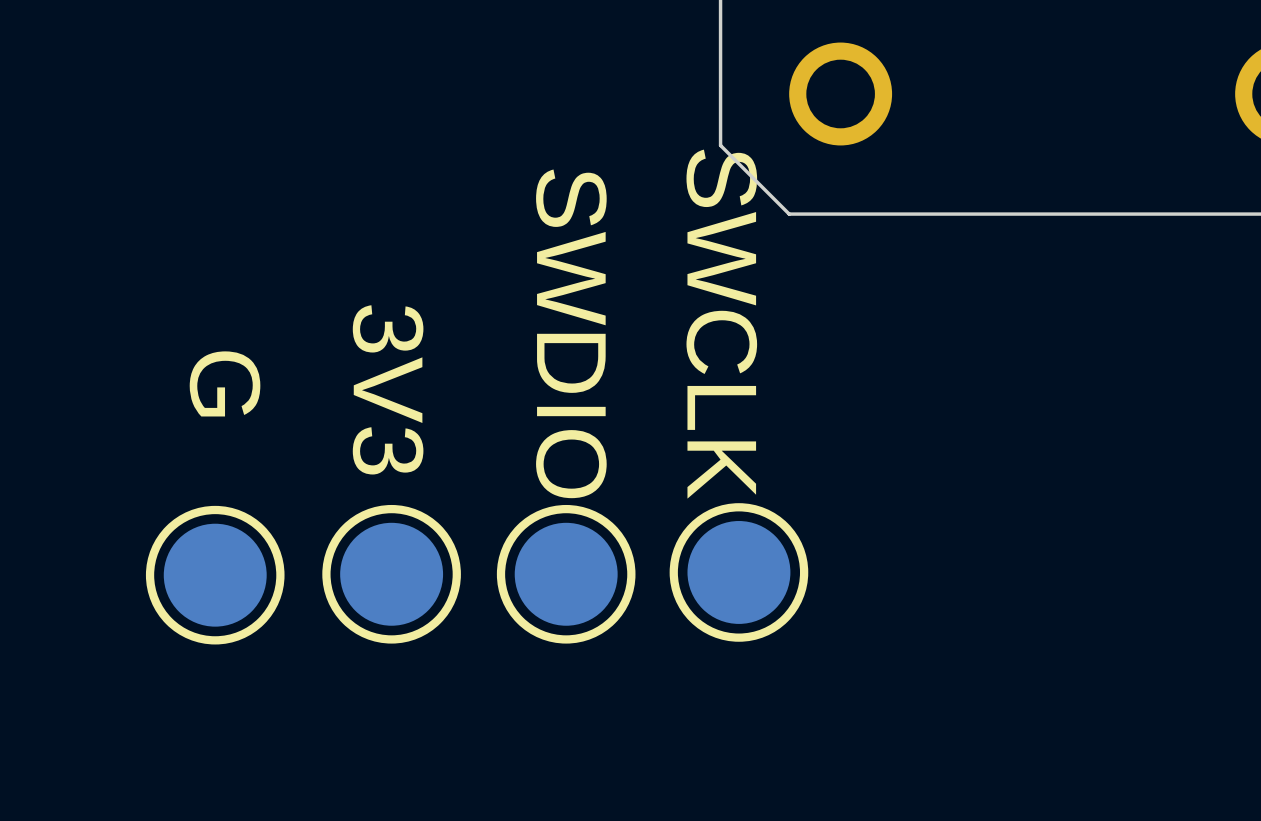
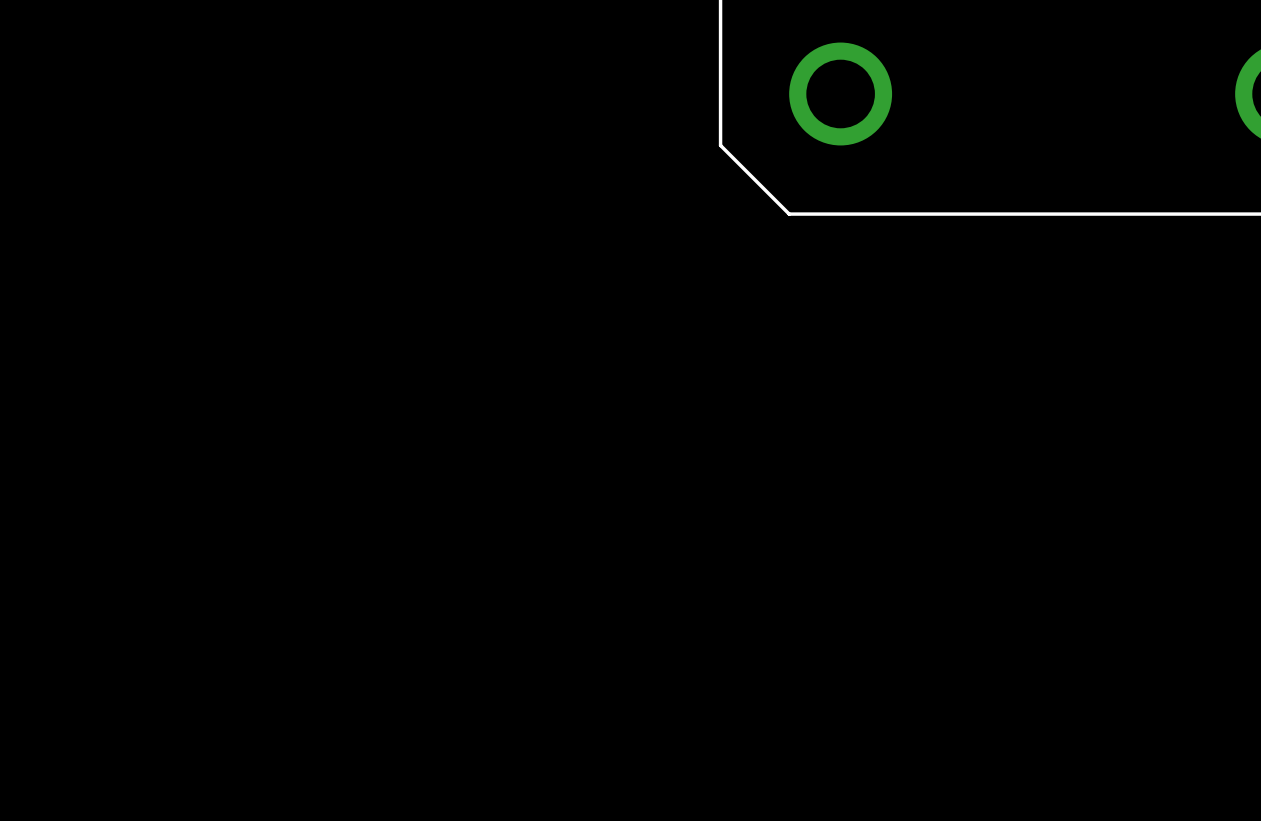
SWCLK: (738, 572) -> none
3V3: (391, 574) -> none
SWDIO: (566, 574) -> none
G: (215, 575) -> none

